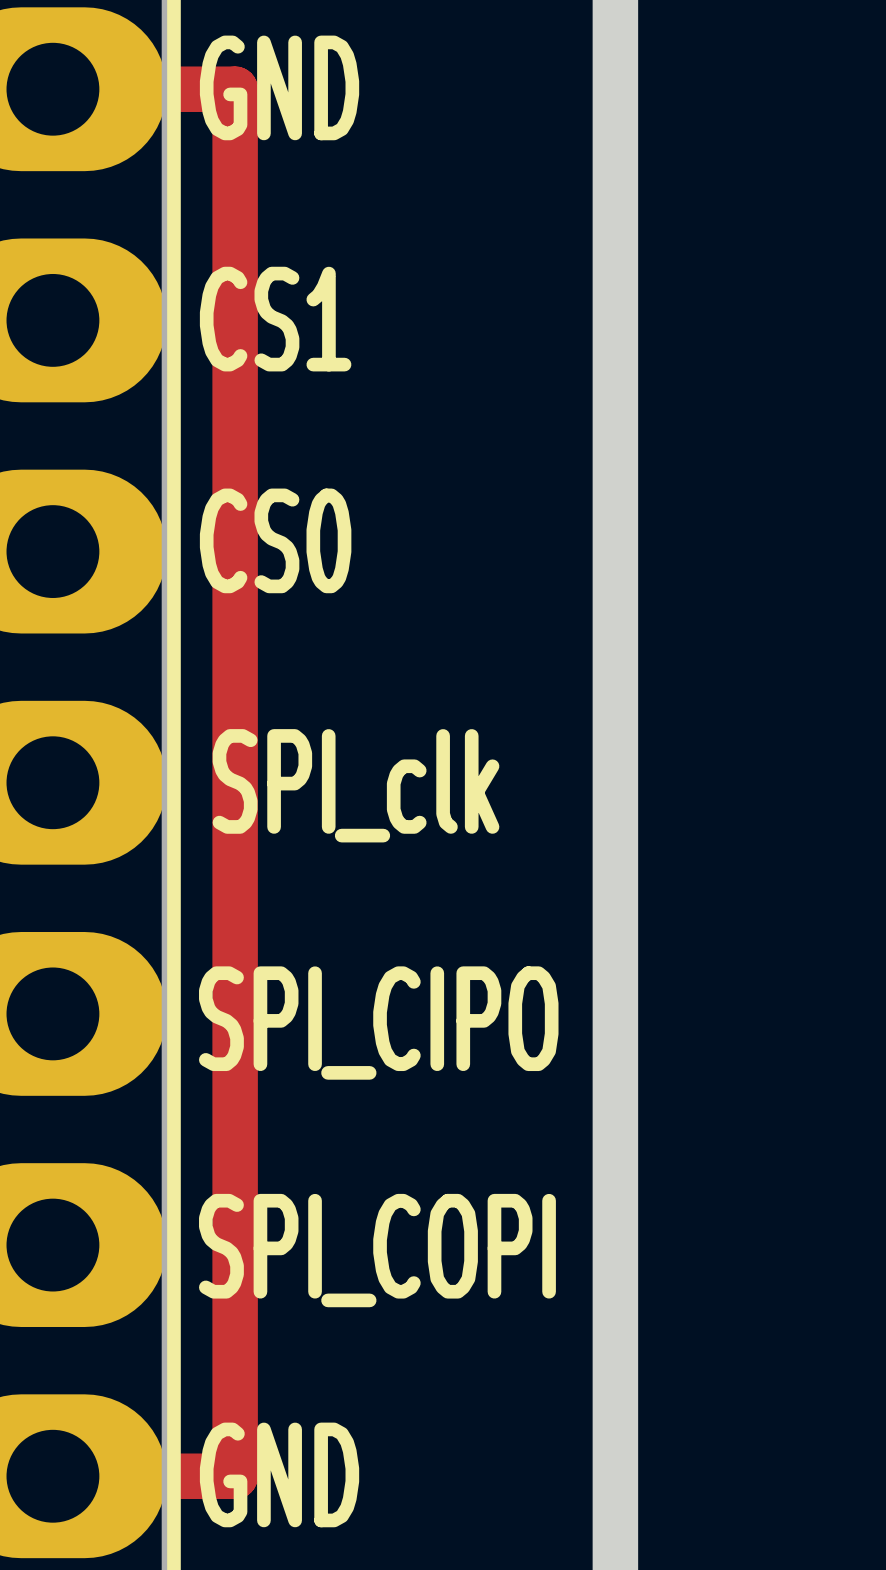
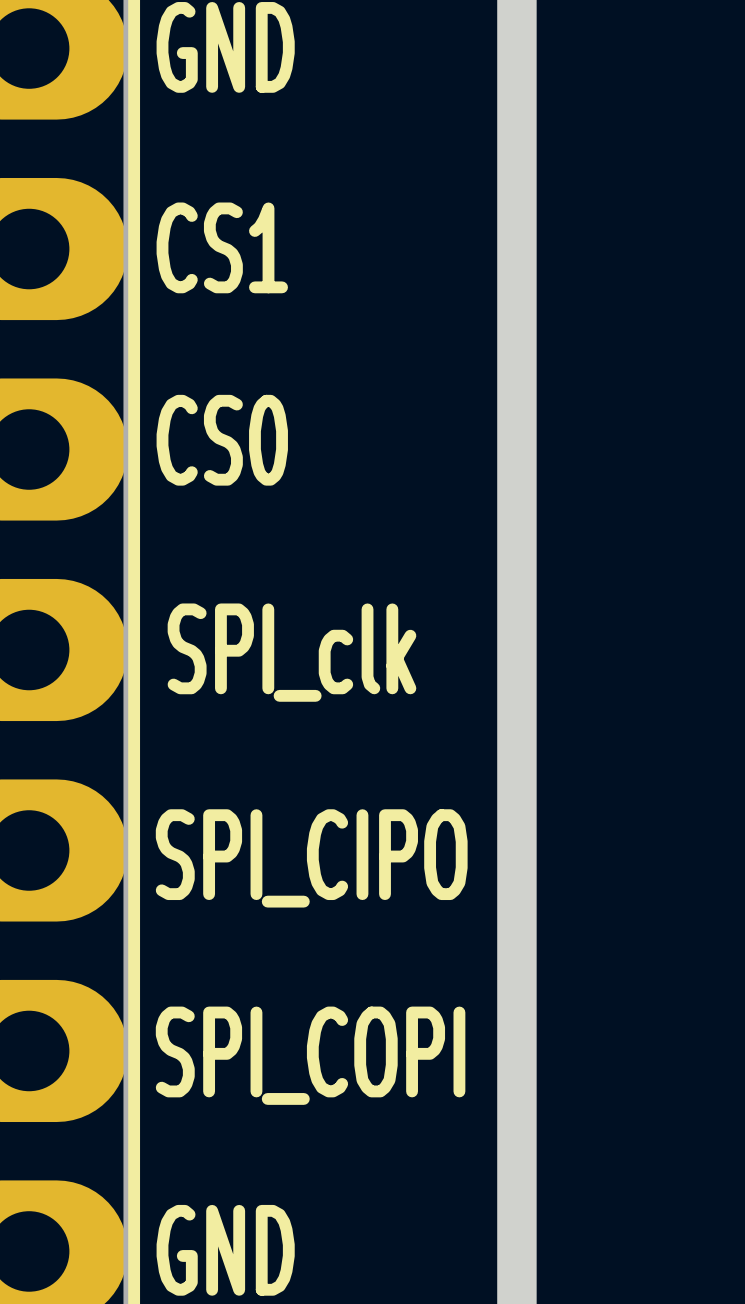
track: (52, 89) (235, 89) (235, 1476) (52, 1476) -> none

